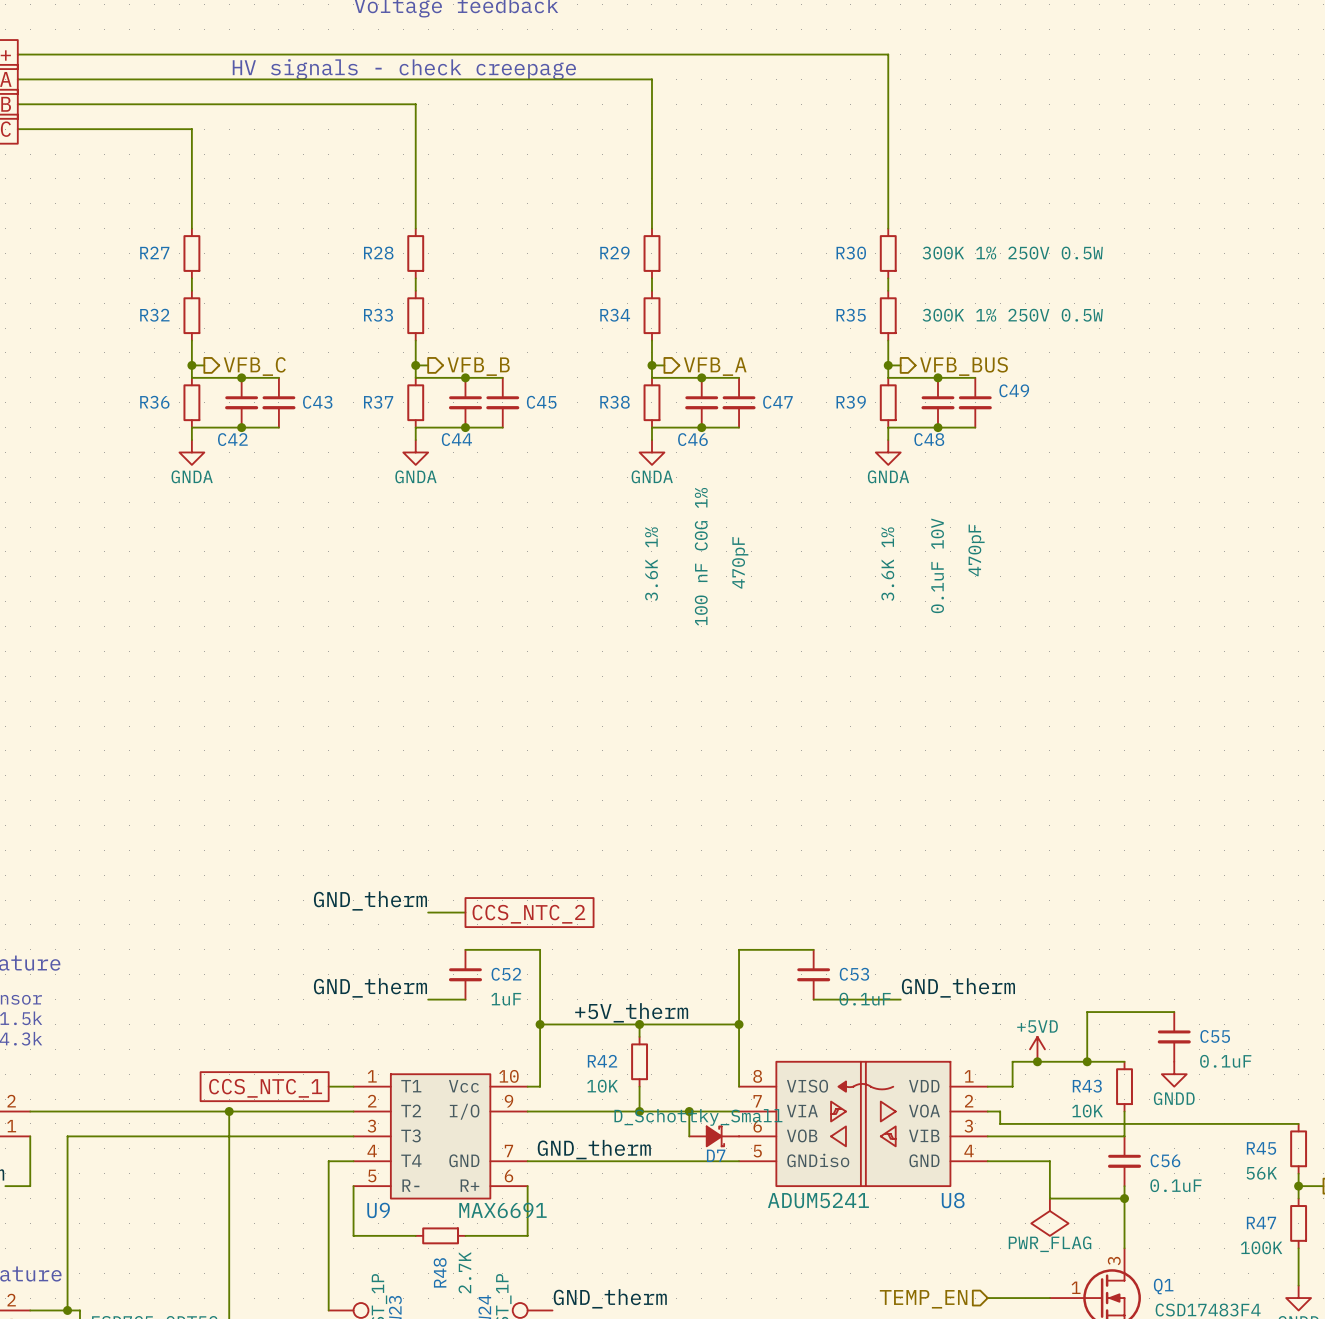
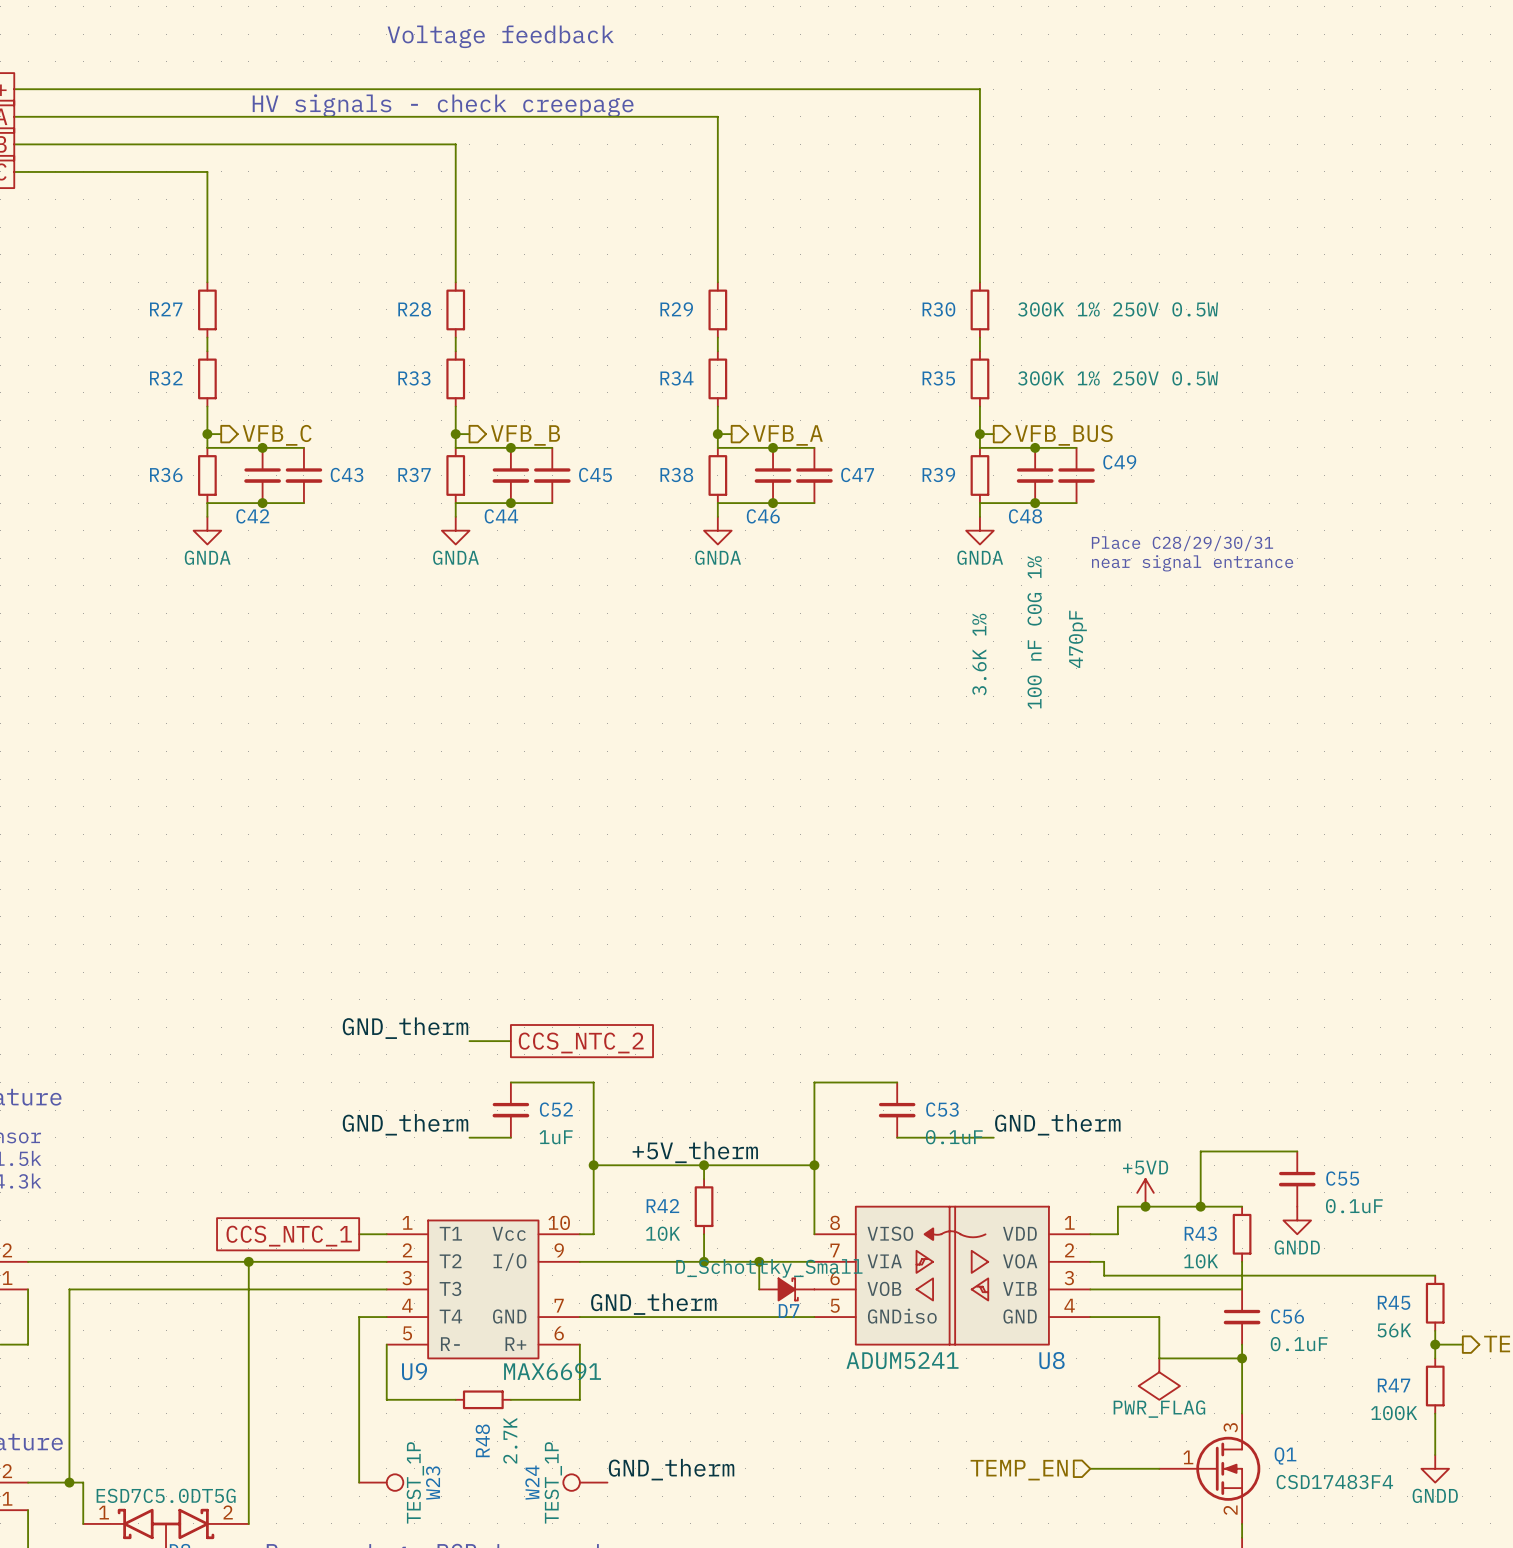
text: none -> Place C28/29/30/31 (1182, 543)
text: none -> near signal entrance (1192, 563)
C46 value: 100 nF C0G 1% (701, 556) -> none
C47 value: 470pF (740, 562) -> none
R38 value: 3.6K 1% (651, 564) -> none
C48 value: 0.1uF 10V (937, 565) -> 100 nF C0G 1% (1034, 632)

